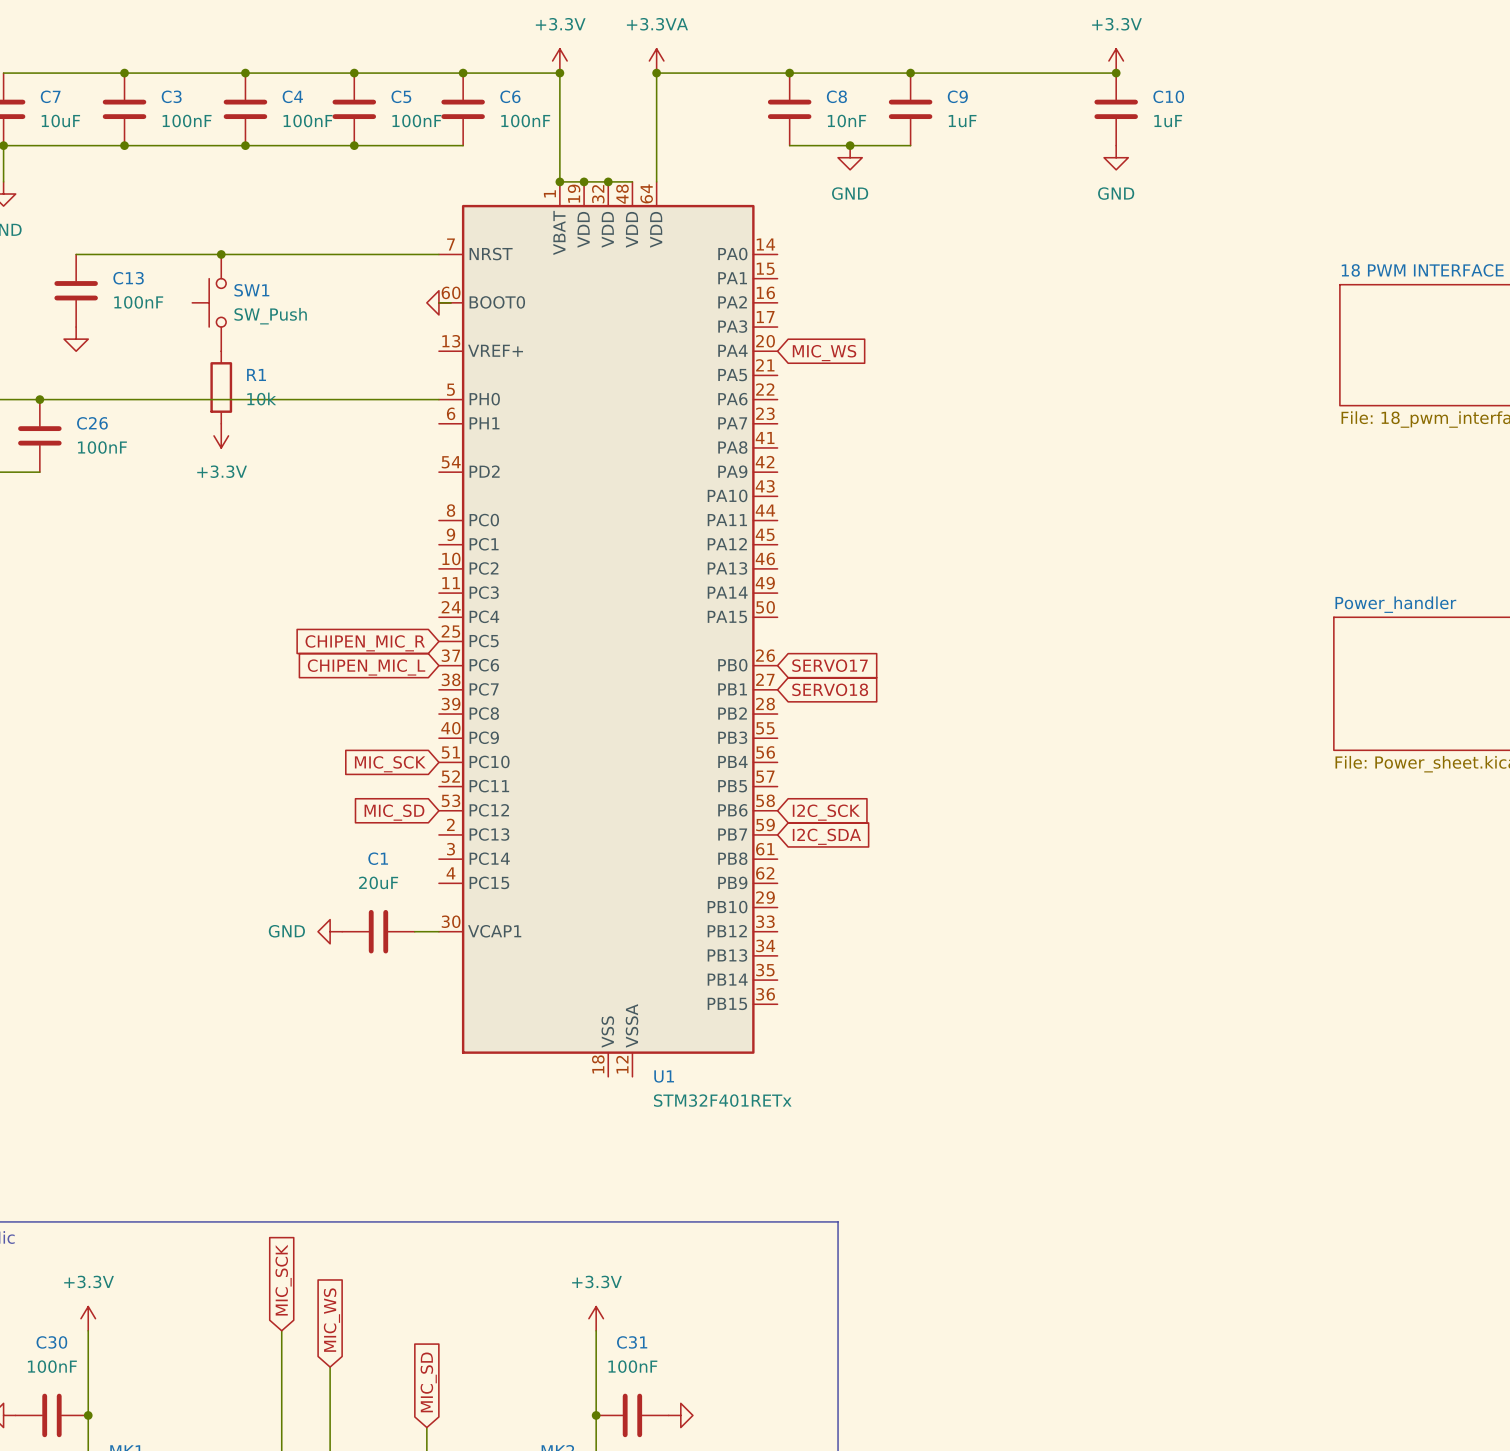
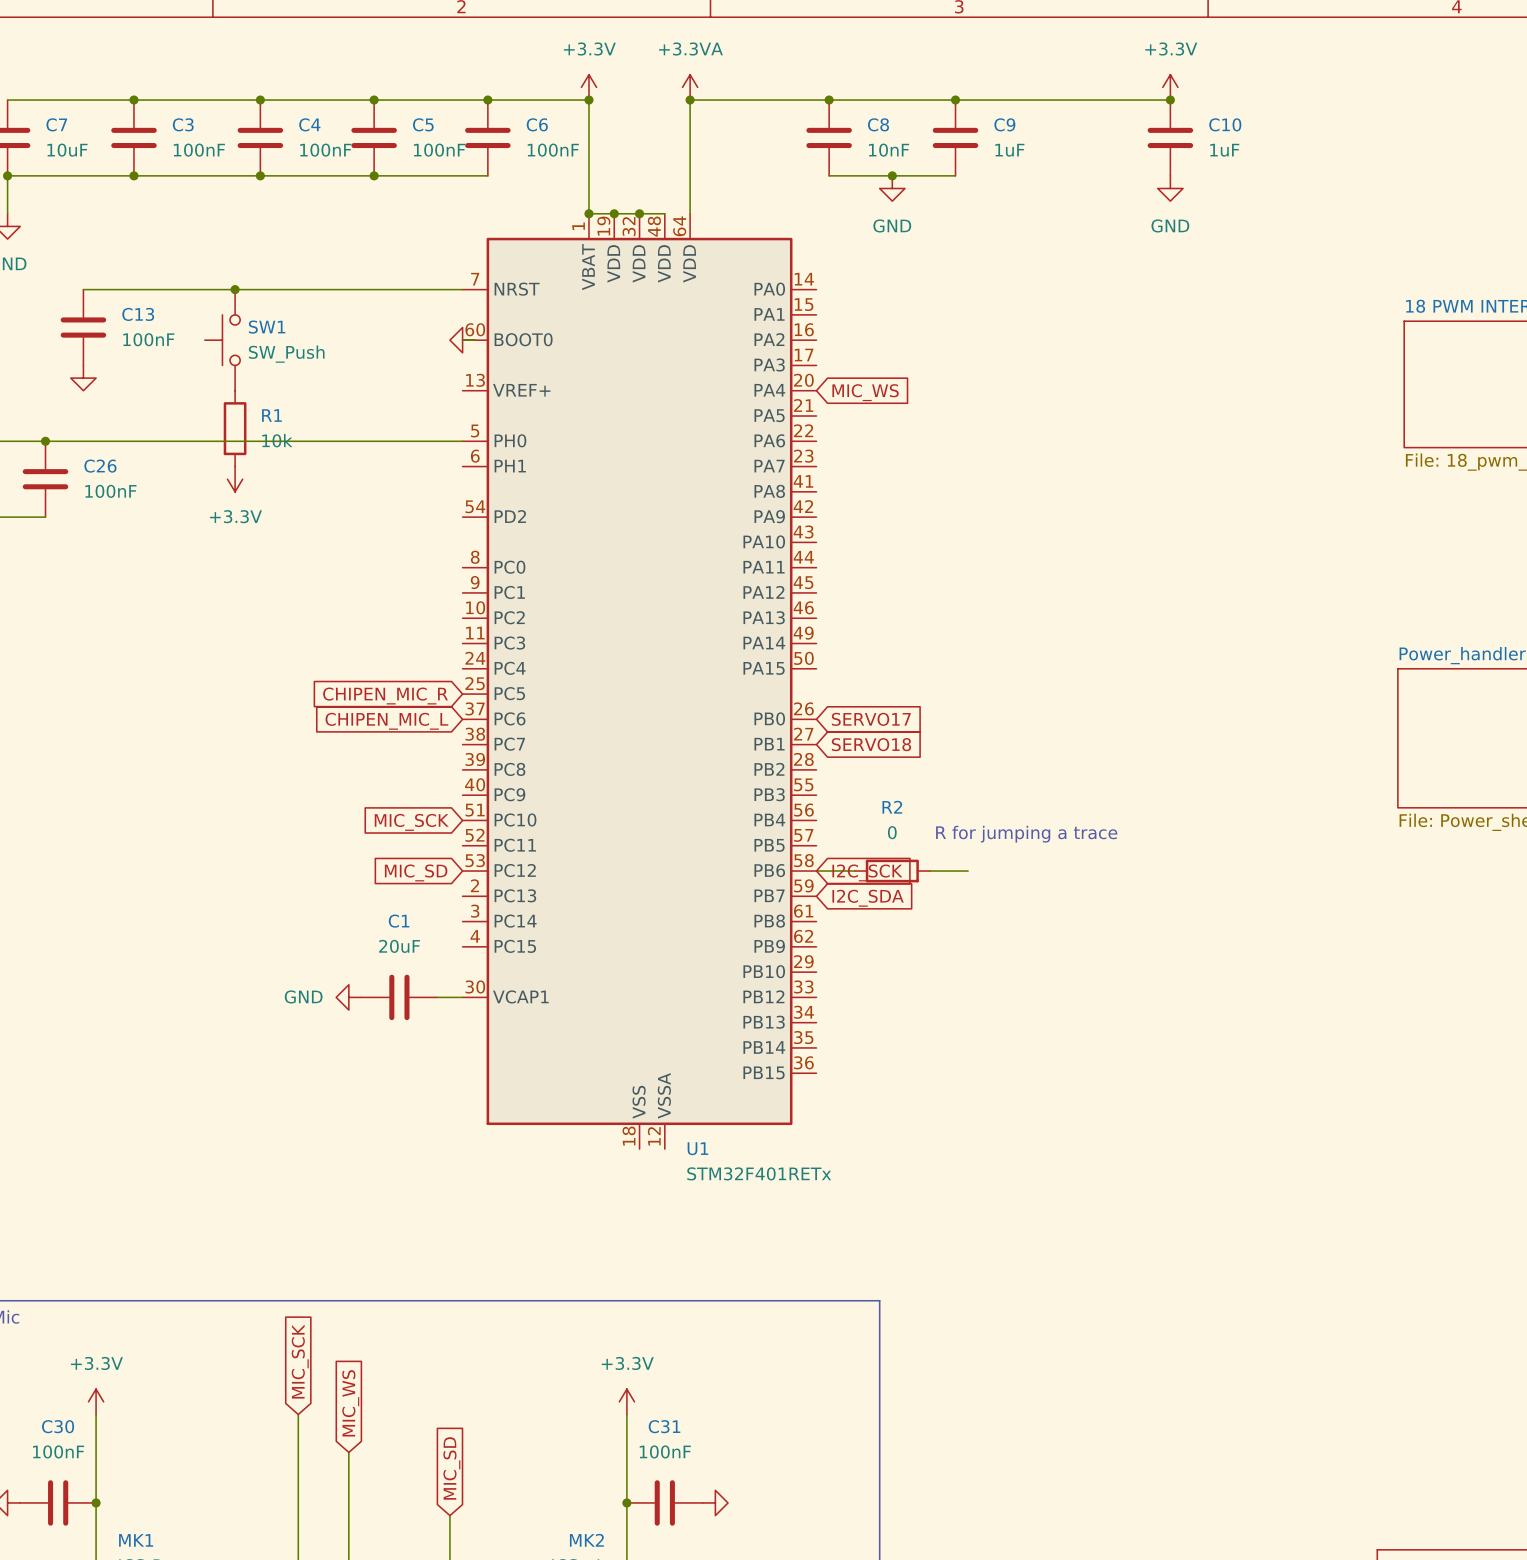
text: none -> R for jumping a trace (1026, 834)
wire: none -> (816, 871) (854, 871)
R2: none -> 0 (892, 871)
wire: none -> (930, 871) (968, 871)

